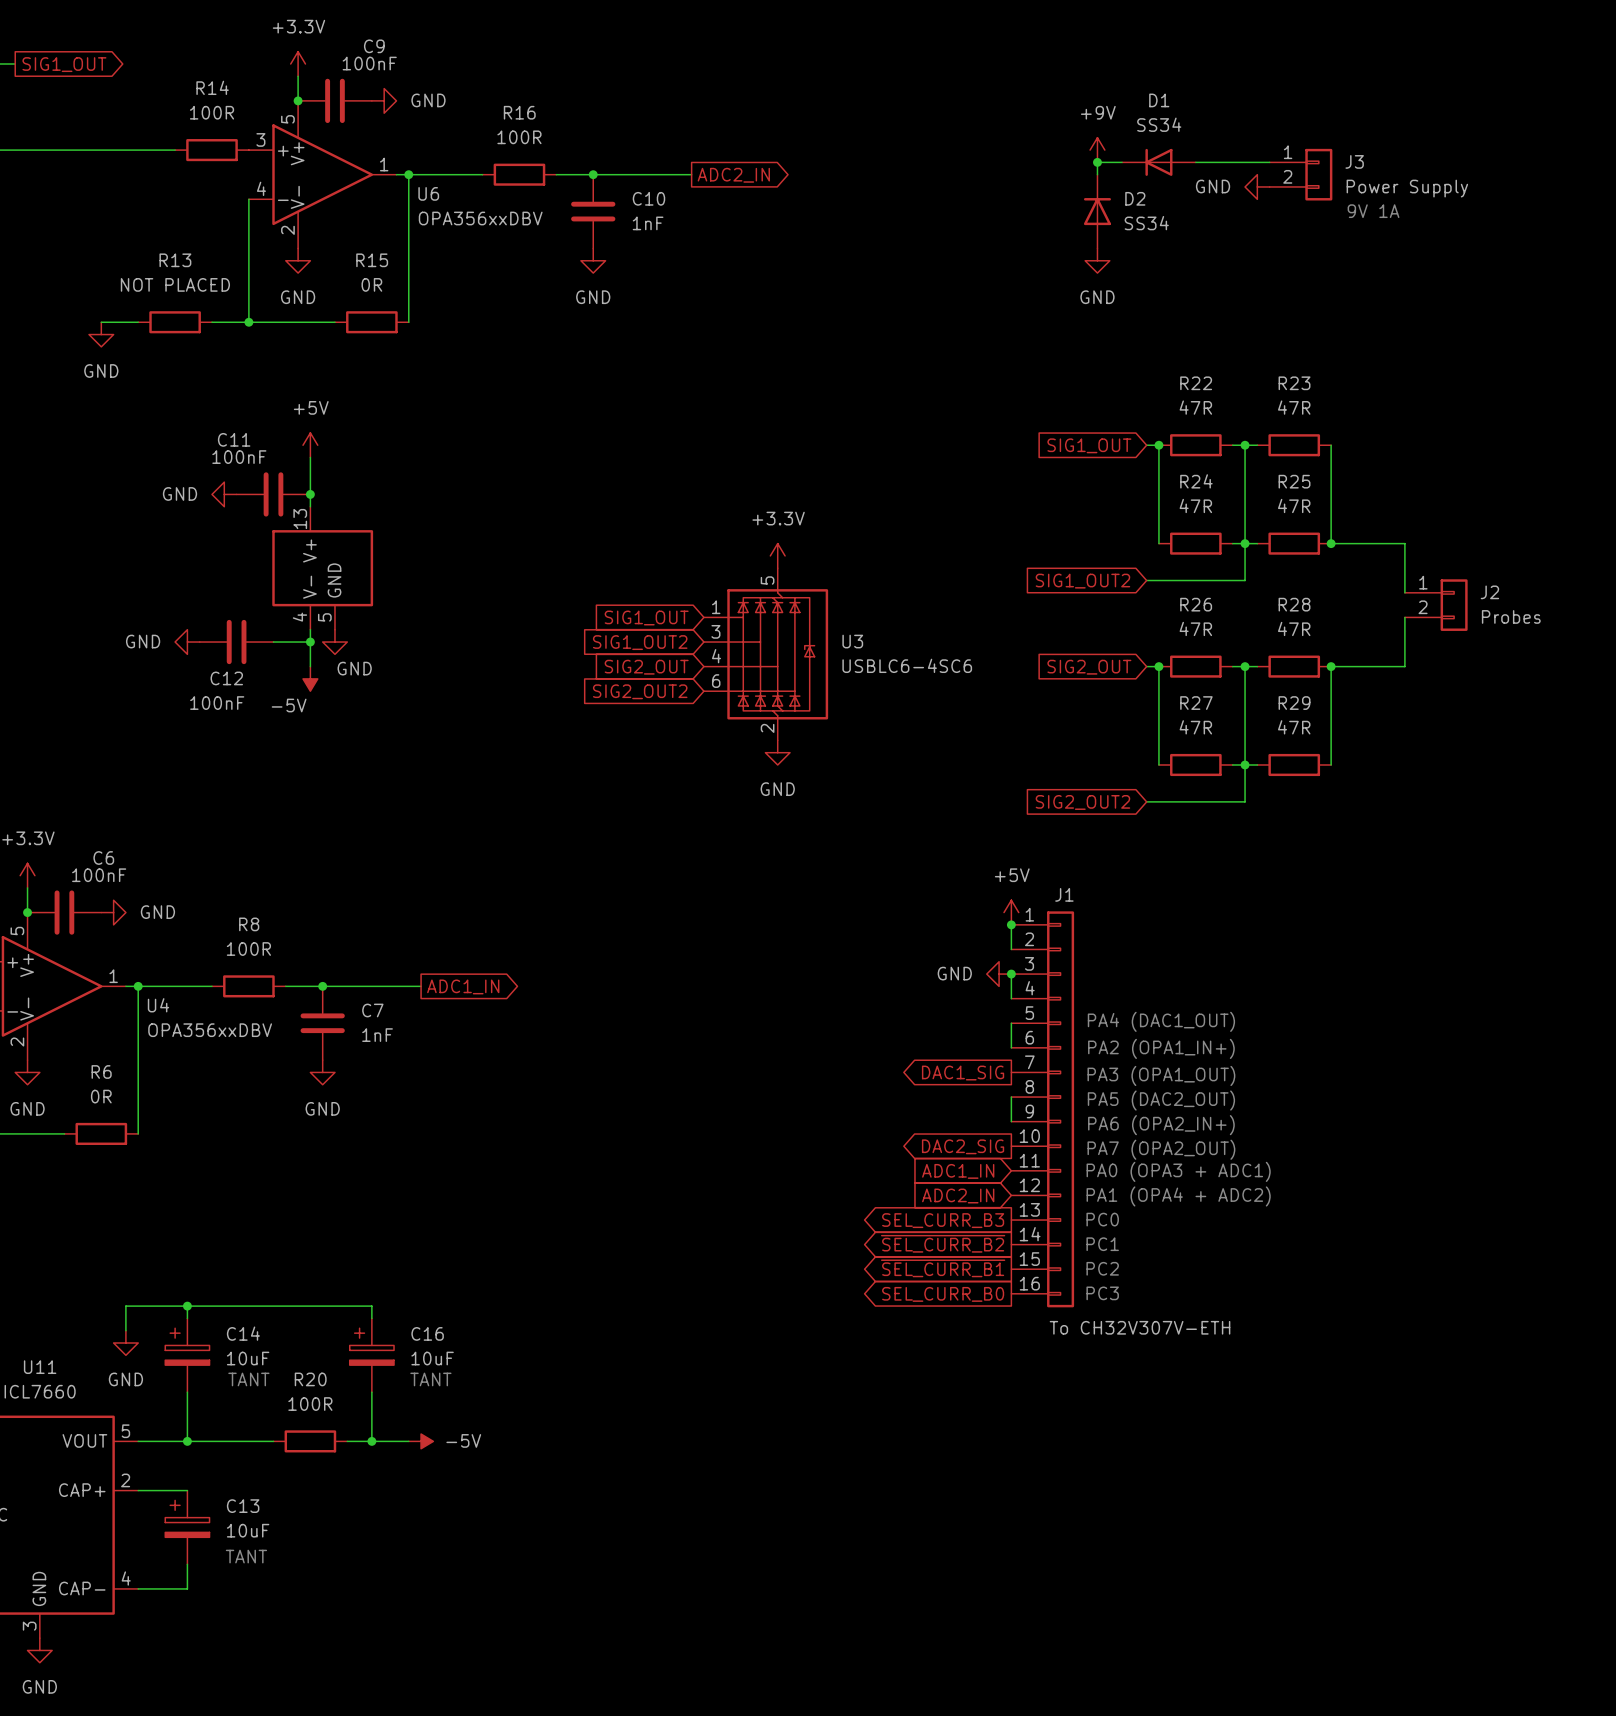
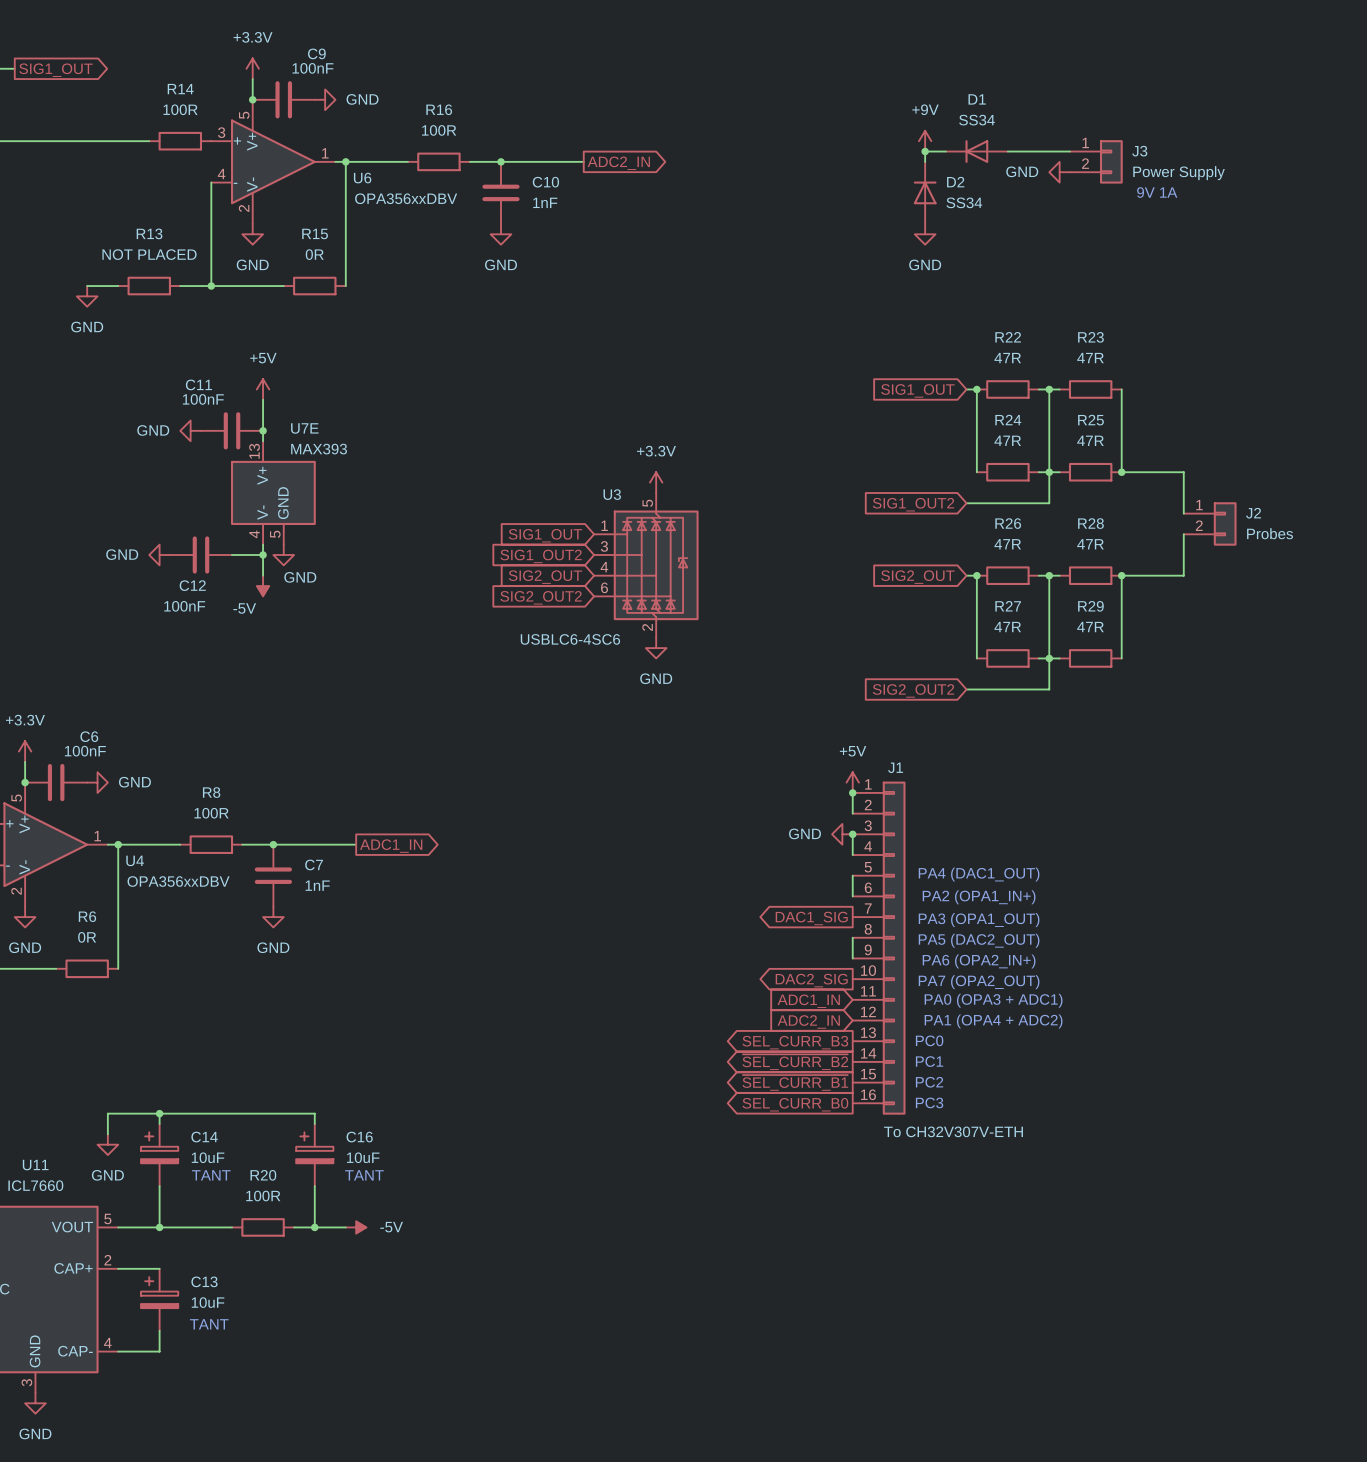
U7E name: none -> U7E (304, 428)
U7E value: none -> MAX393 (319, 449)
U3 name position: U3 (852, 641) -> U3 (612, 494)
U3 value position: USBLC6-4SC6 (907, 665) -> USBLC6-4SC6 (570, 639)

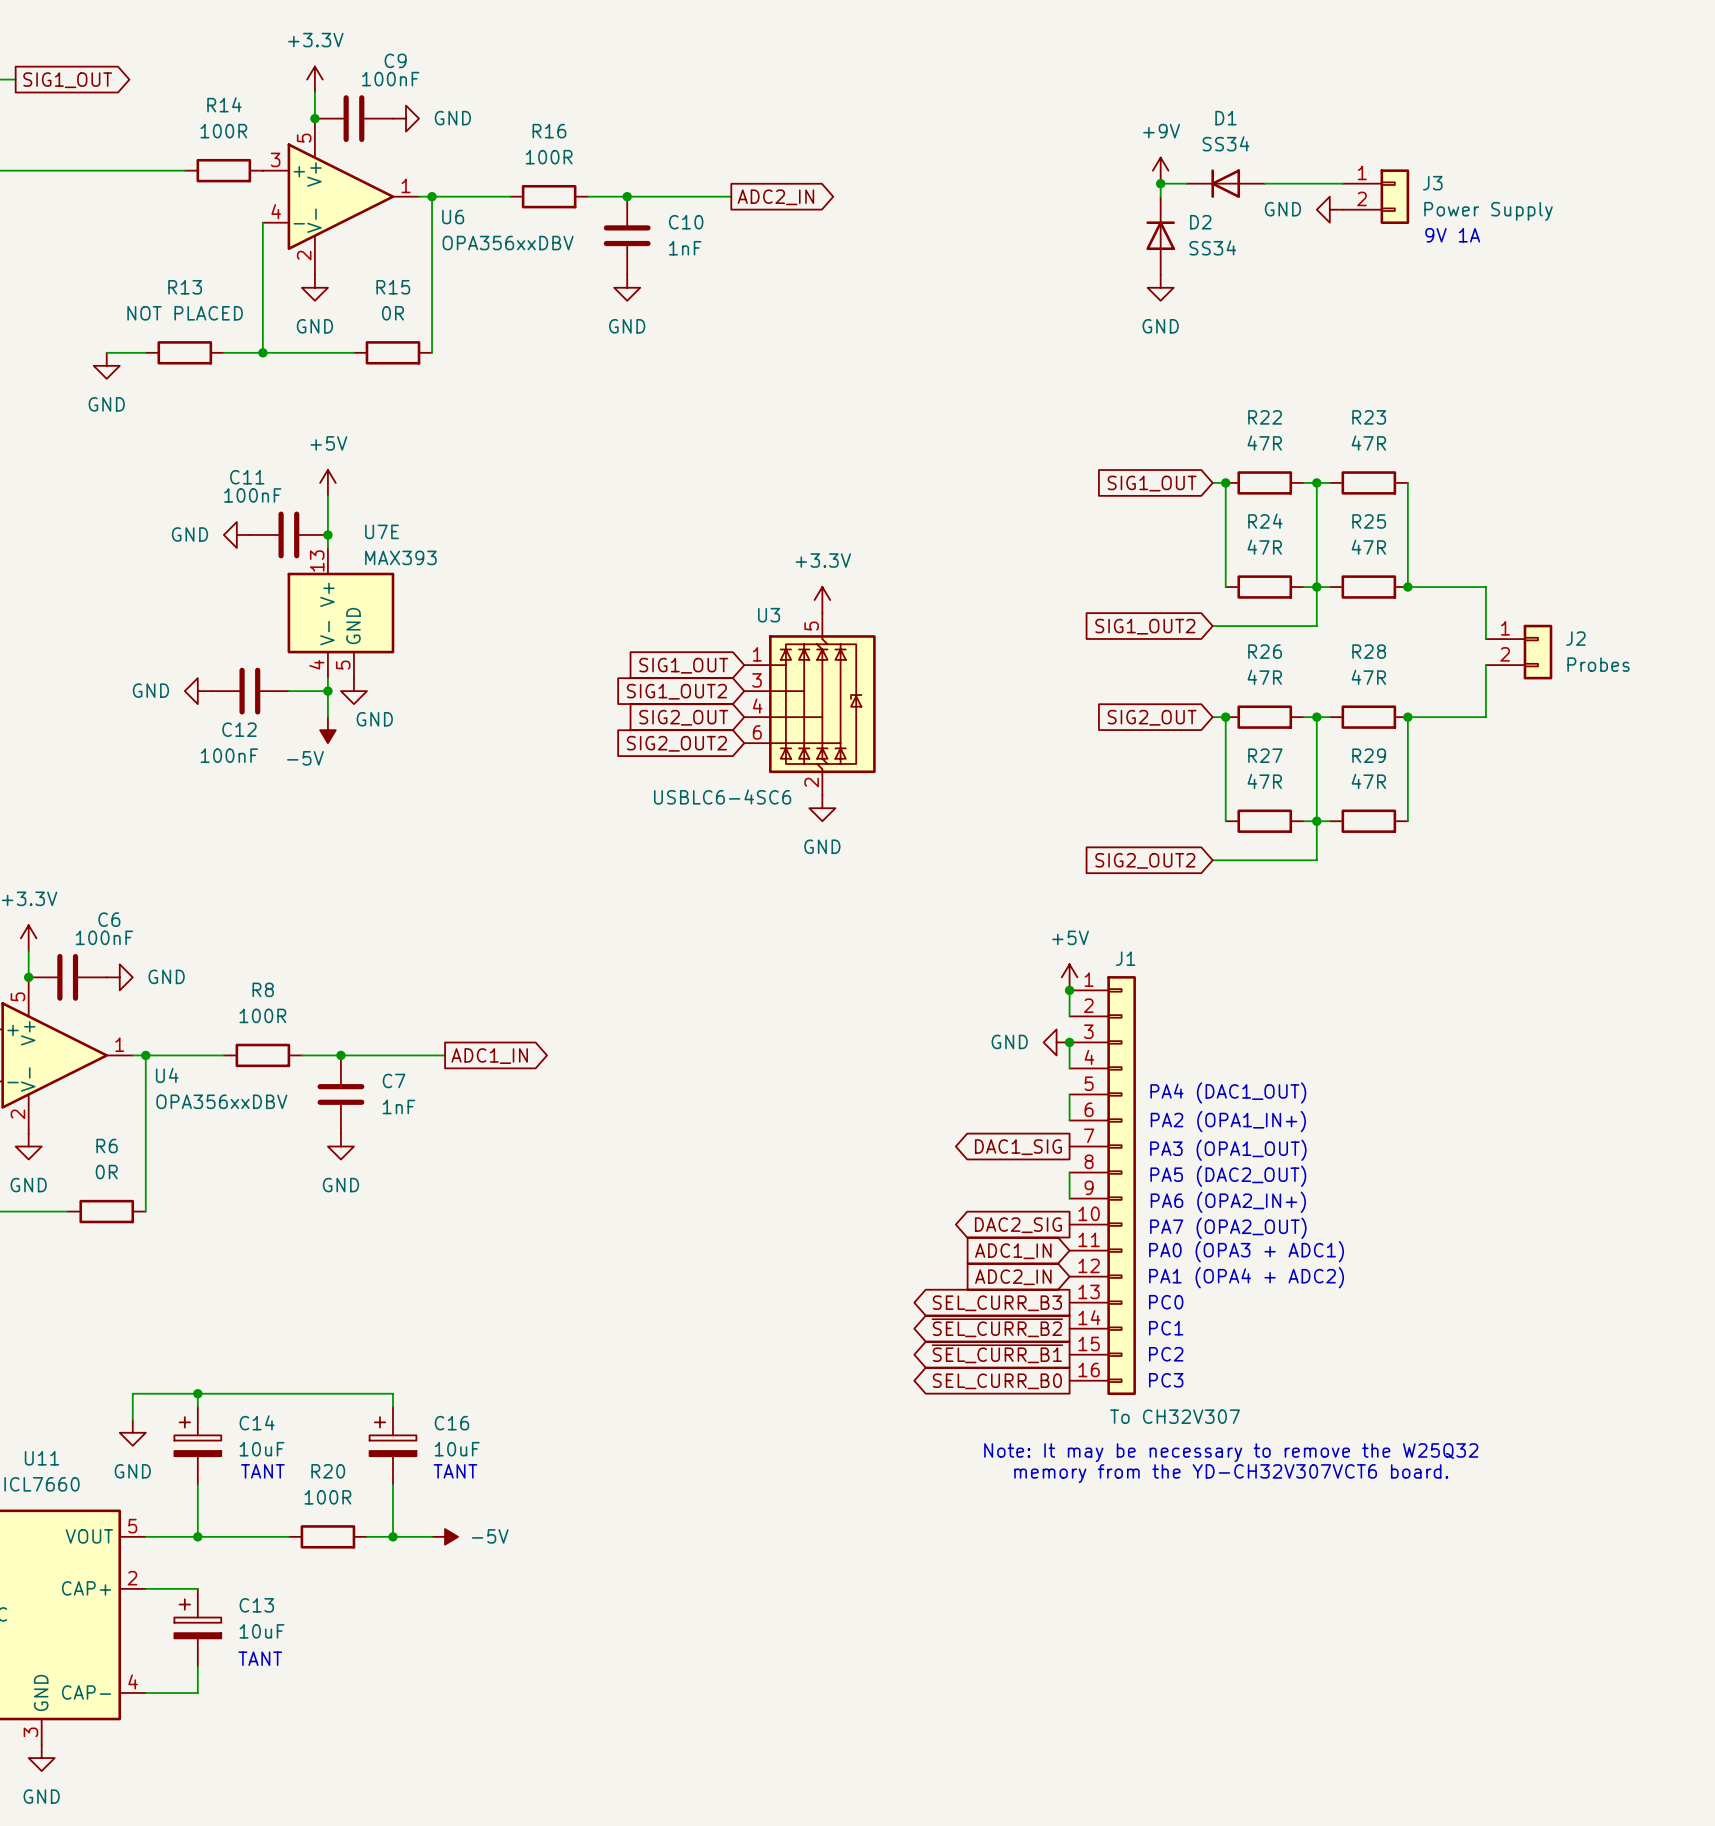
J1 value: To CH32V307V-ETH (953, 1131) -> To CH32V307 (1175, 1416)
text: none -> Note: It may be necessary to remove the W25Q32 (1231, 1452)
text: none -> memory from the YD-CH32V307VCT6 board. (1231, 1473)

